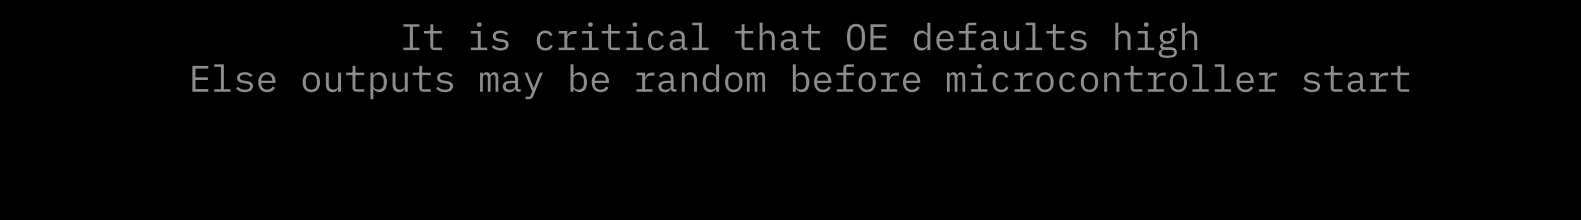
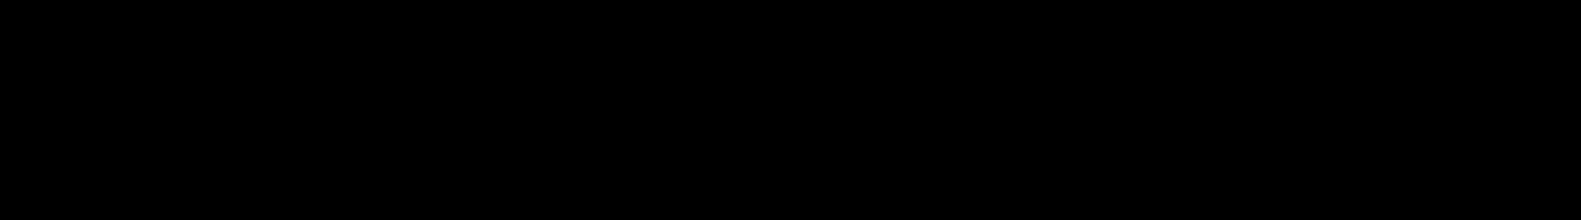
text: It is critical that OE defaults high (800, 40) -> none
text: Else outputs may be random before microcontroller start (800, 81) -> none

